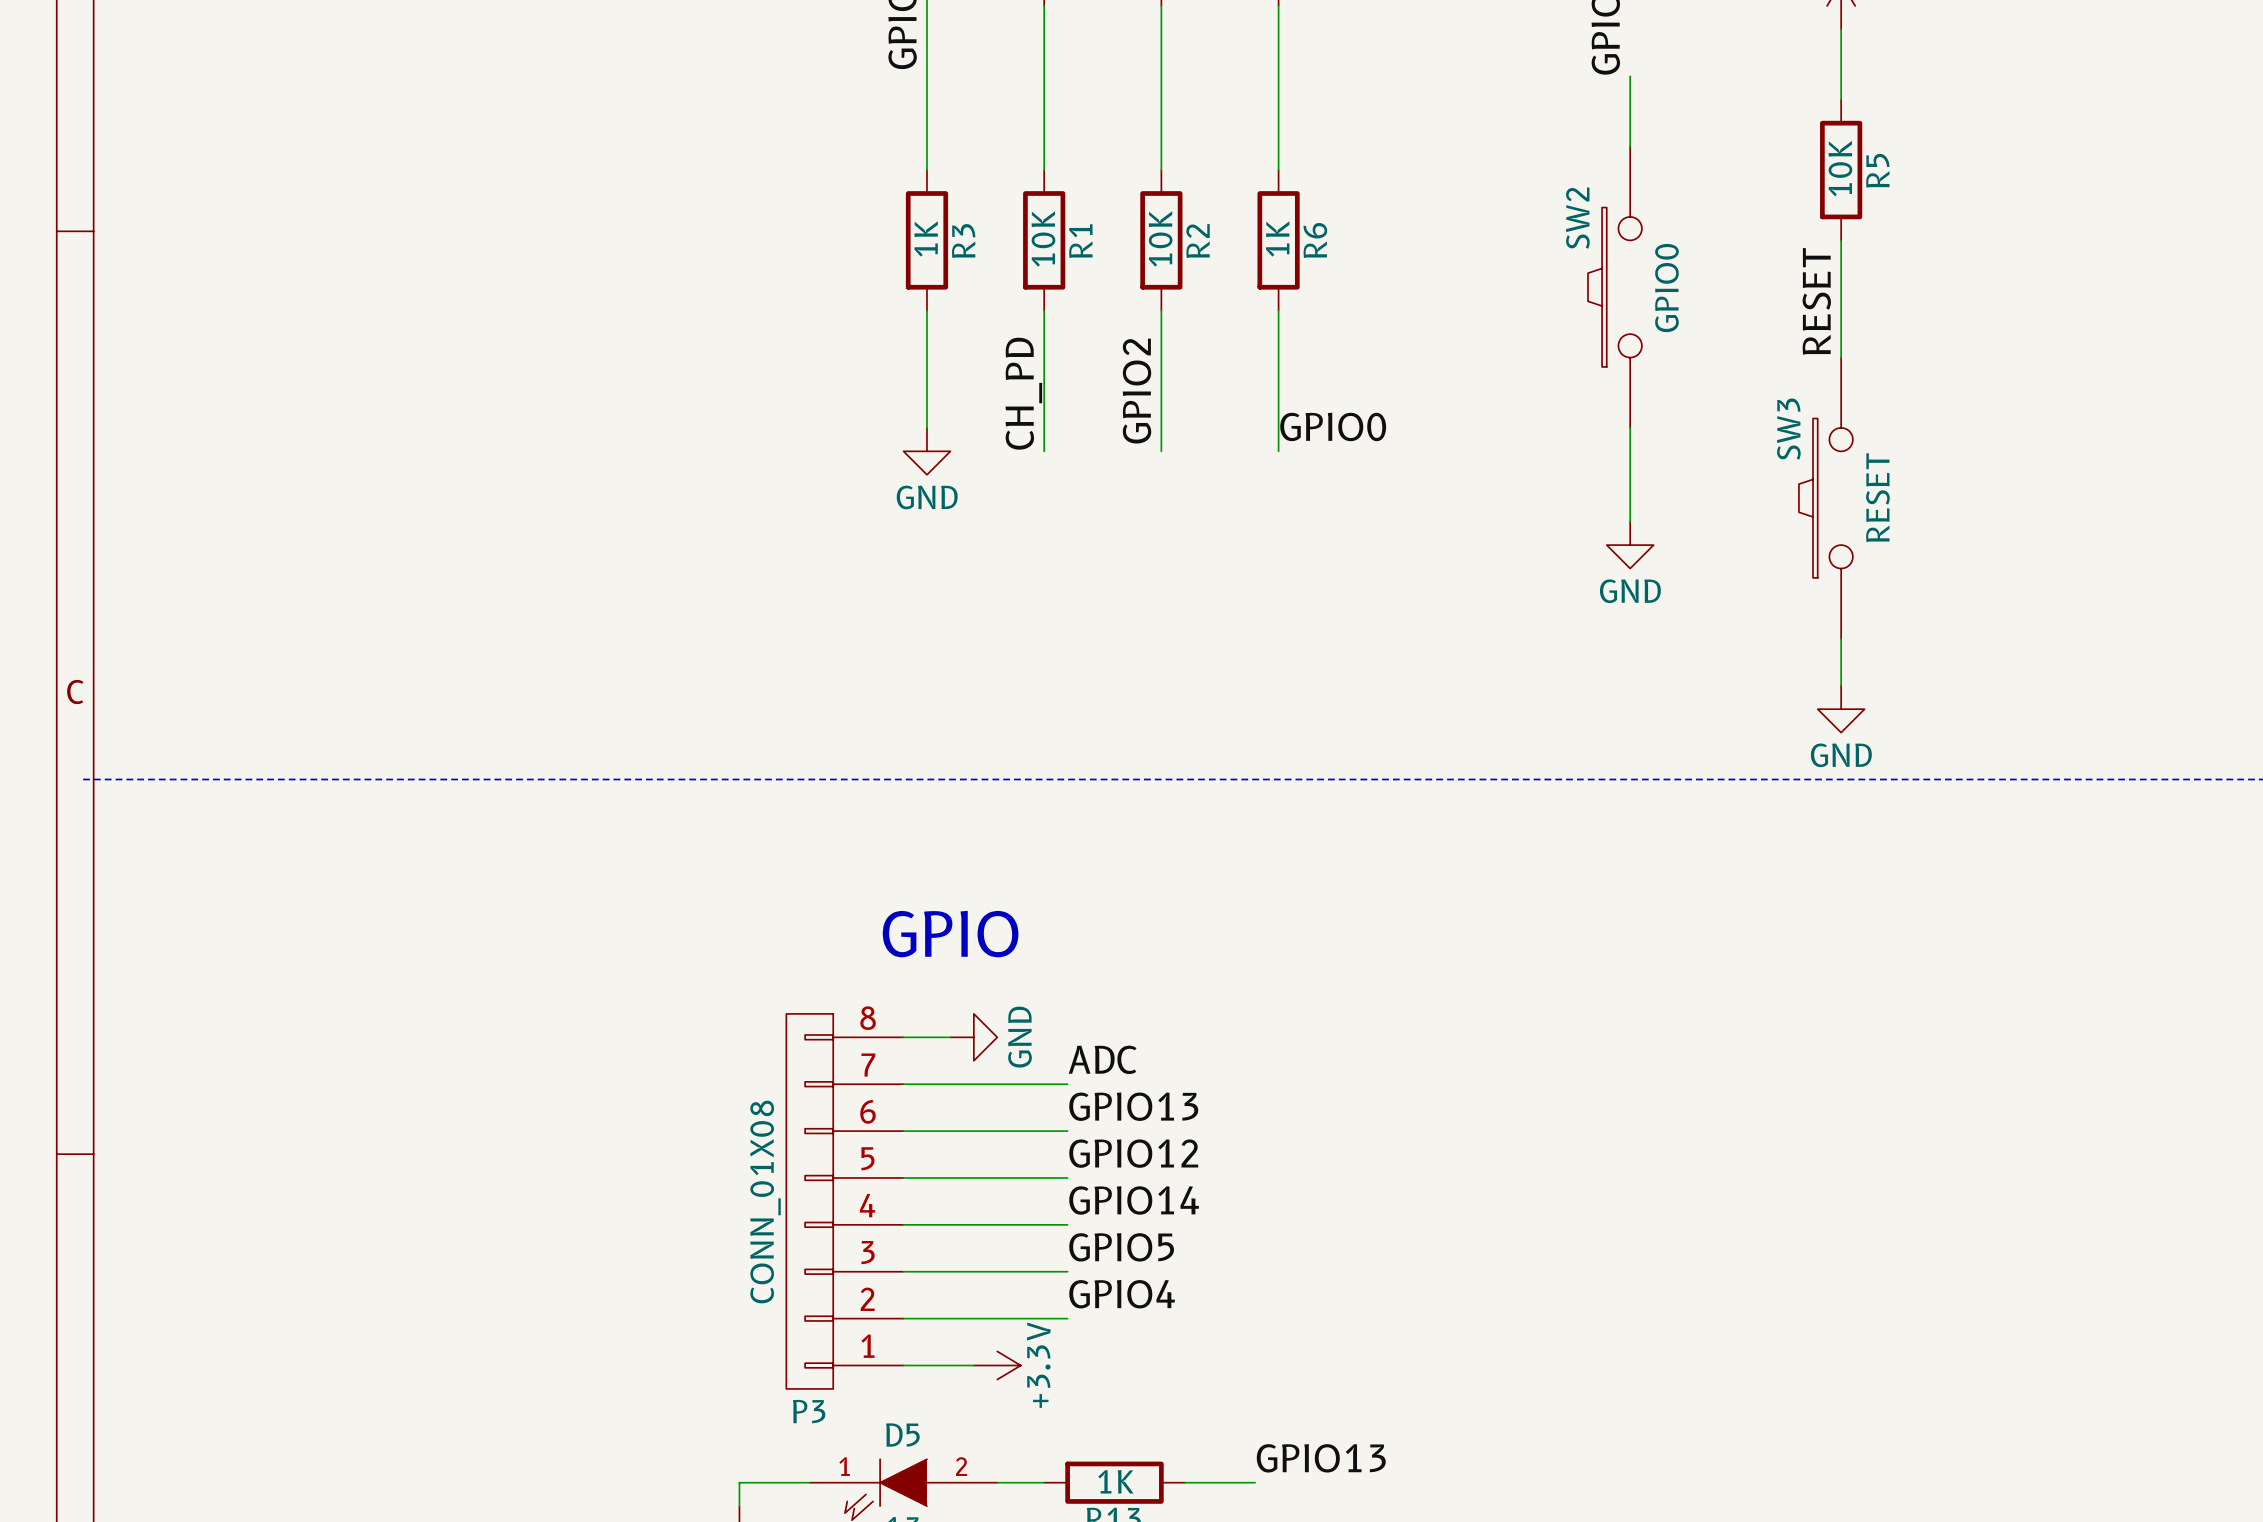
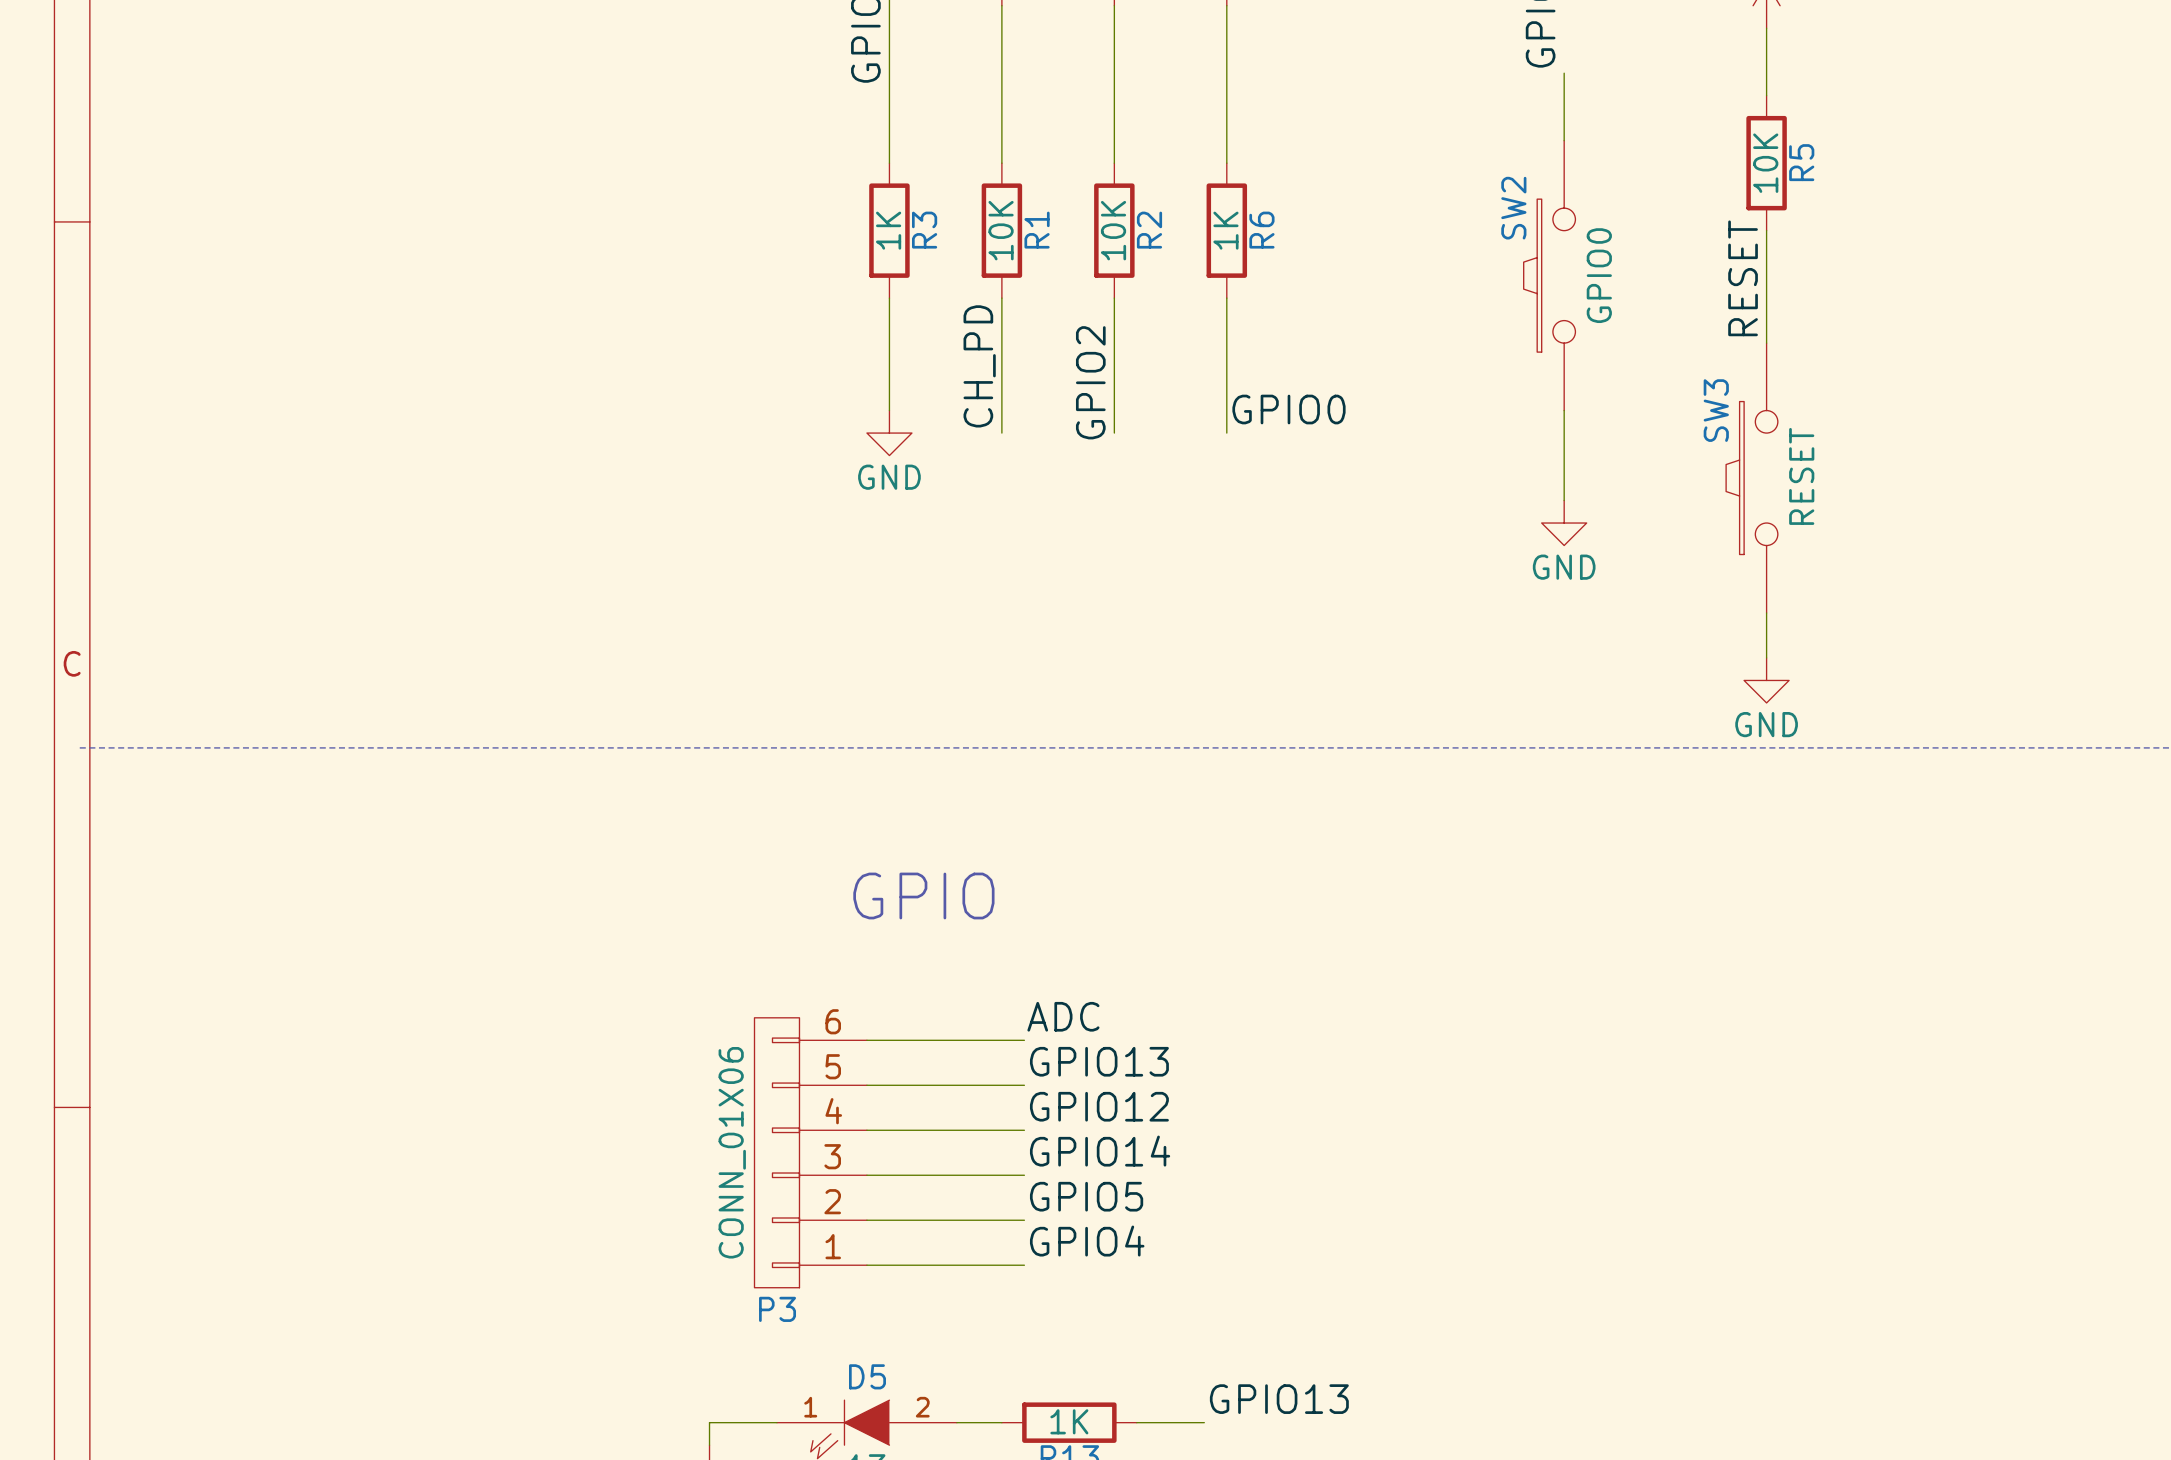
P3 symbol: [786, 1013, 904, 1389] -> [754, 1017, 867, 1288]
wire: (903, 1037) (950, 1037) -> none
power symbol: GND (973, 1037) -> none
P3 value: CONN_01X08 (765, 1202) -> CONN_01X06 (732, 1152)
wire: (903, 1365) (973, 1365) -> none
power symbol: +3.3V (997, 1365) -> none
P3 name position: P3 (809, 1411) -> P3 (777, 1309)

